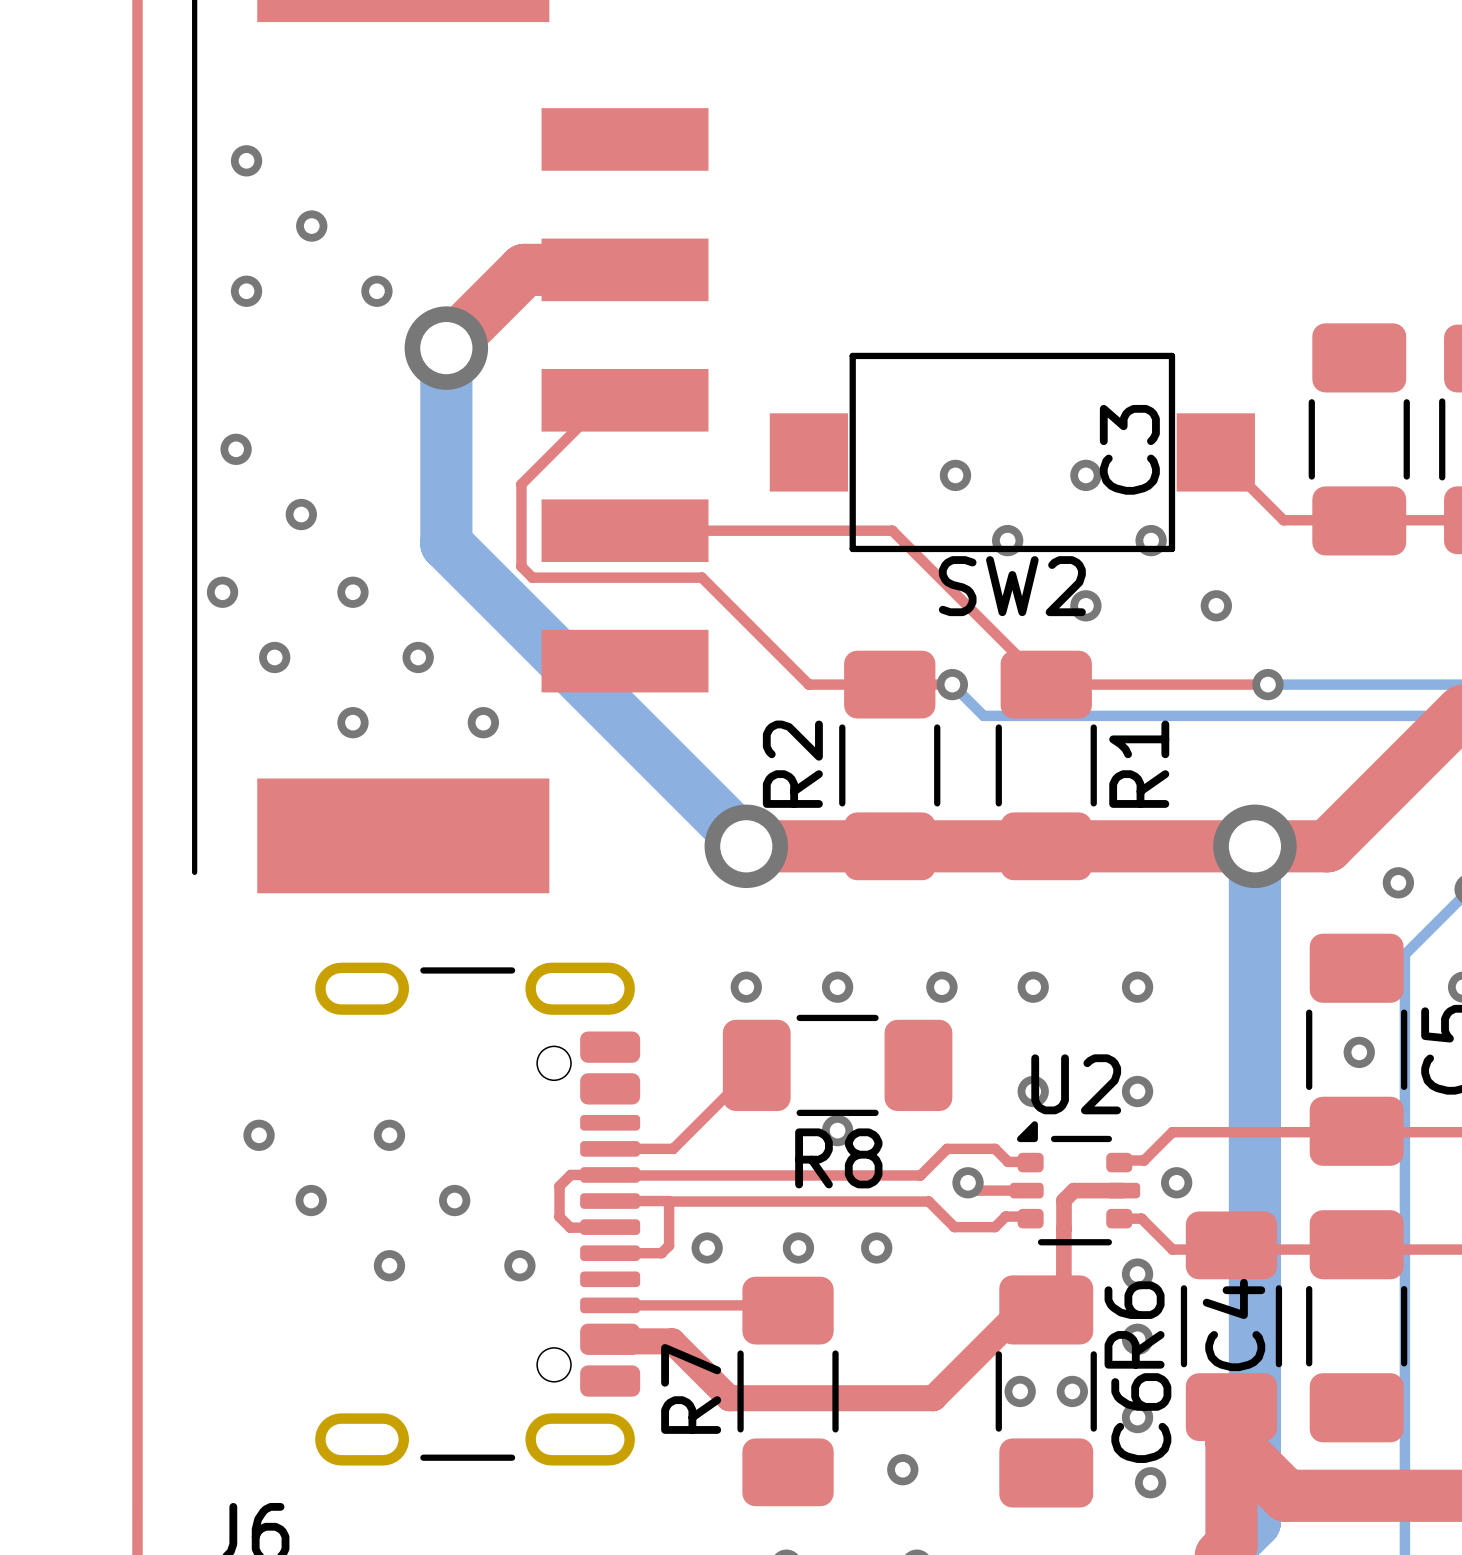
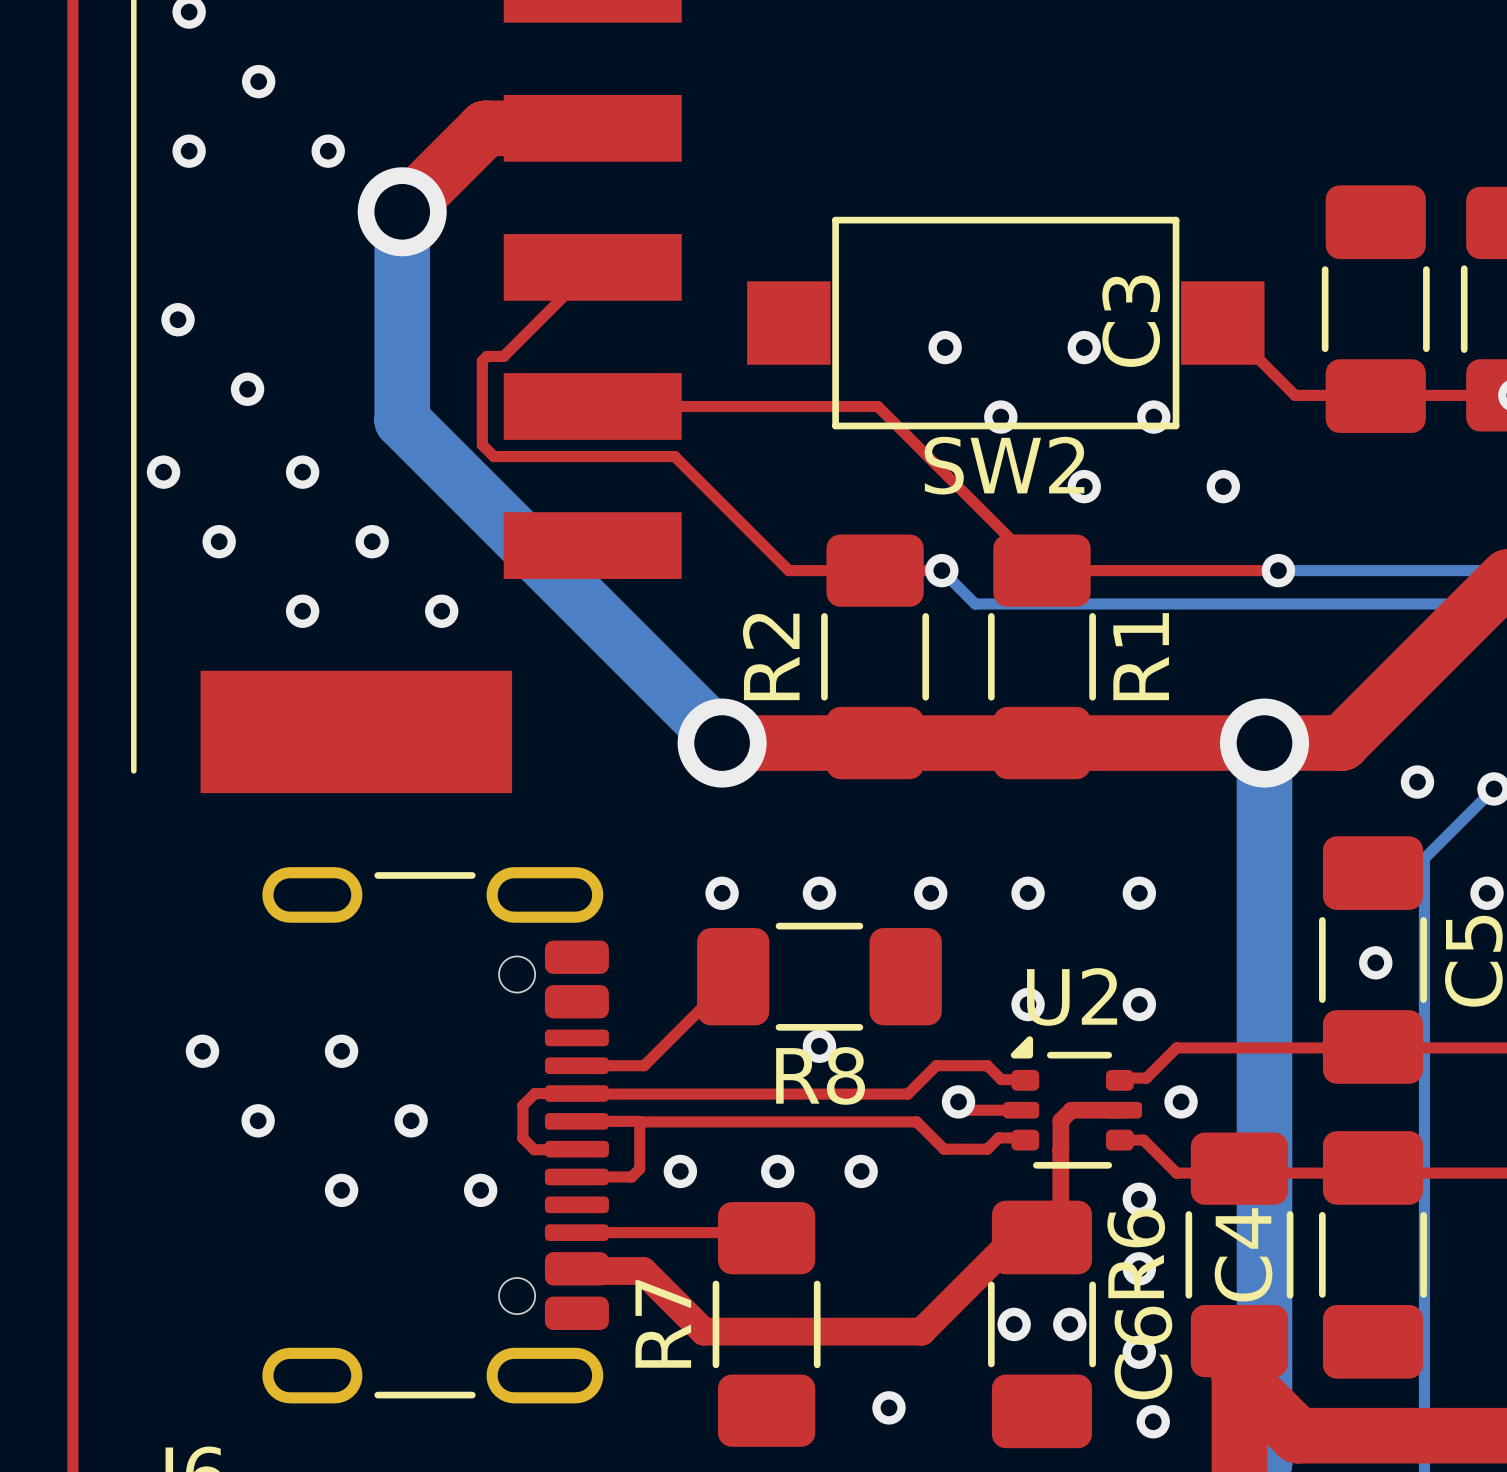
top track: (625, 400) (605, 400) (521, 484) (521, 488) -> (592, 267) (503, 356) (487, 356) (482, 361)

